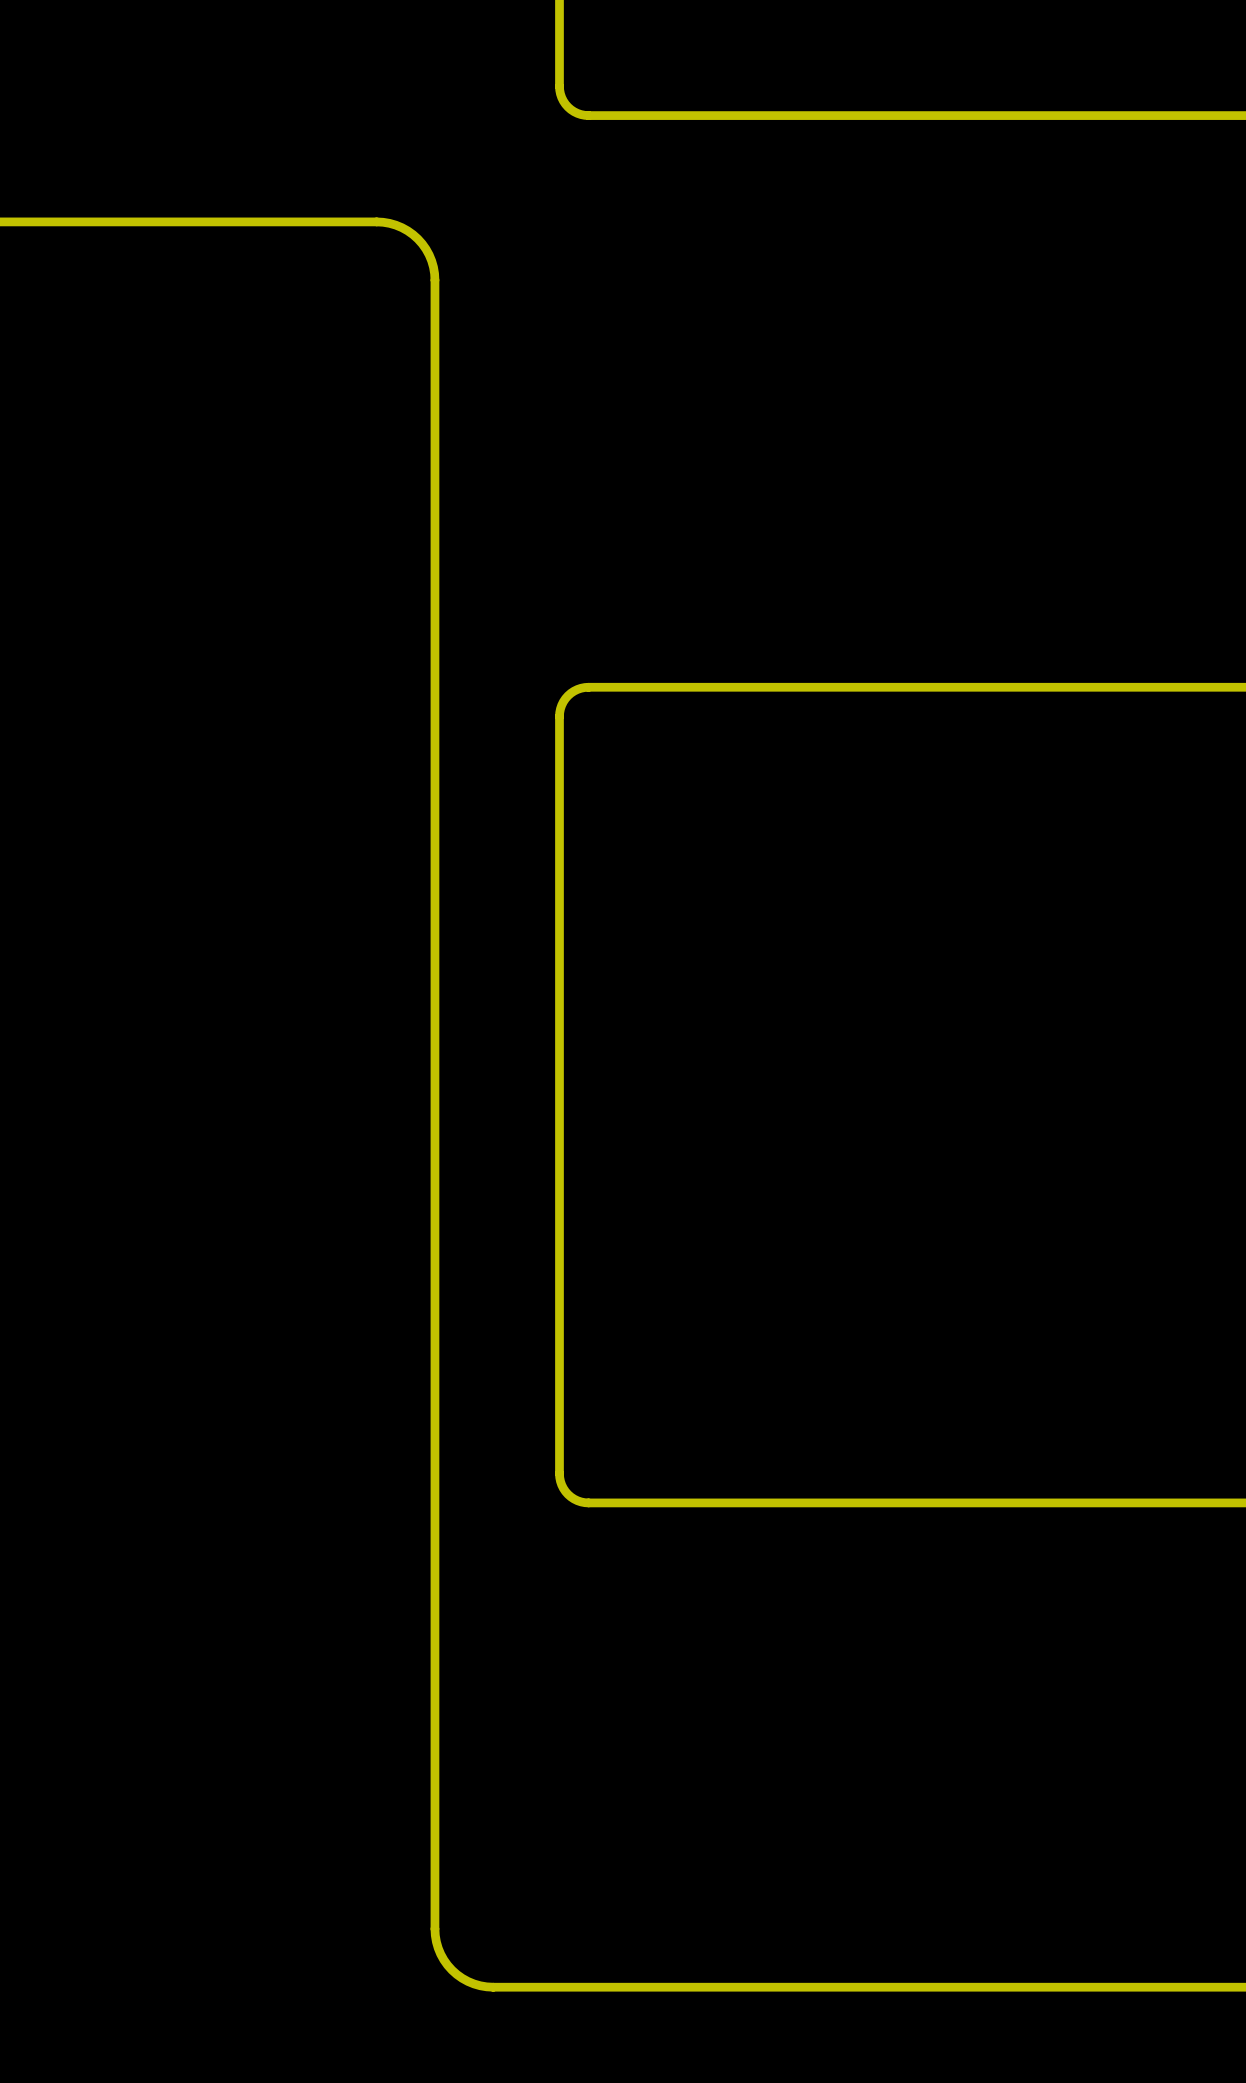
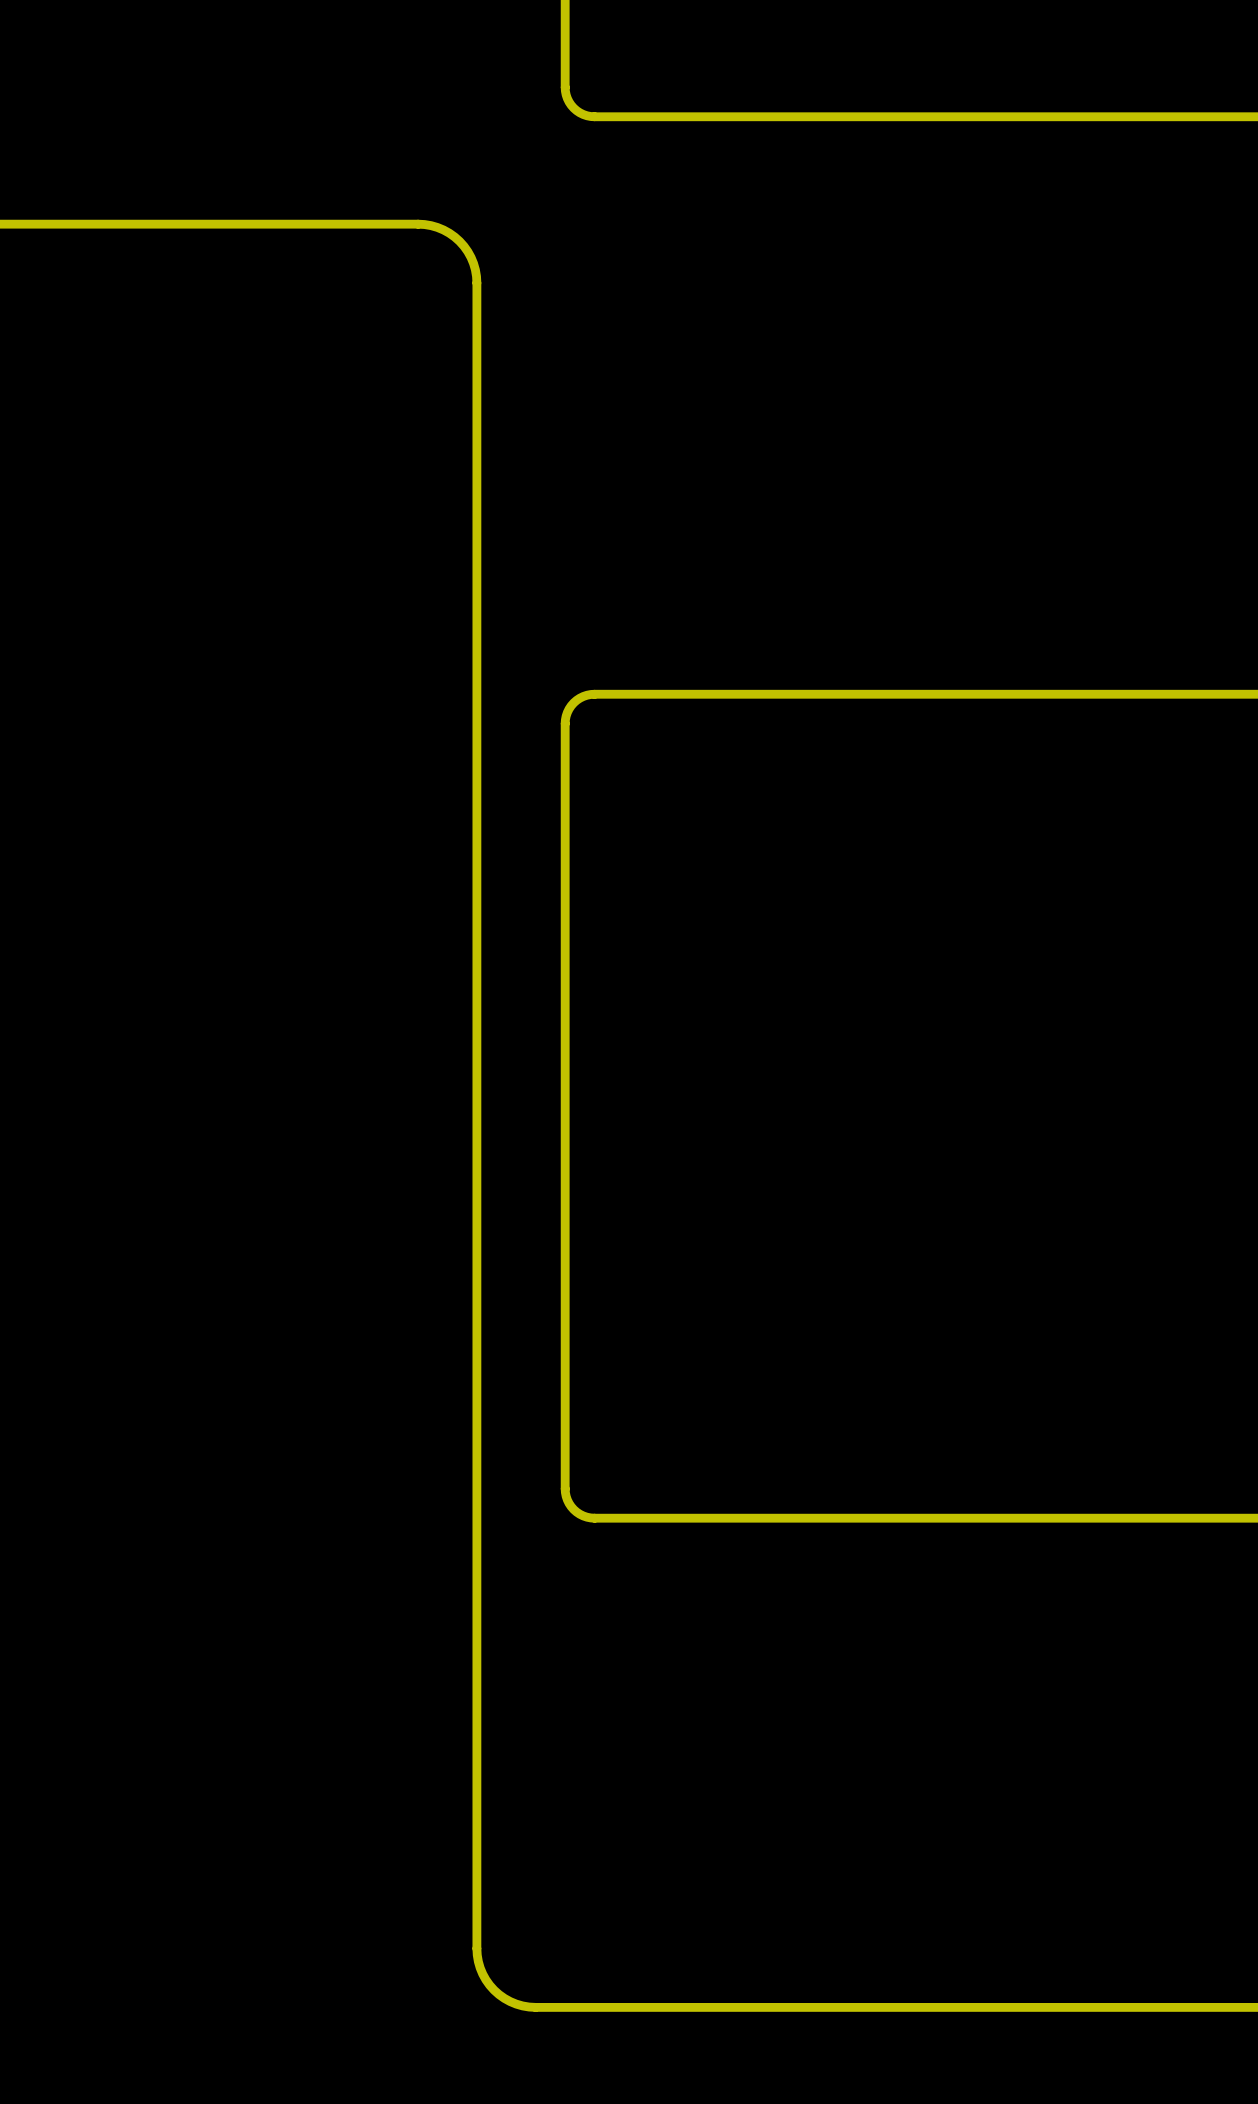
board edge: (376, 221) (401, 227) (417, 238) (429, 254) (434, 280) (435, 1935) (443, 1959) (452, 1970) (467, 1981) (486, 1986) (530, 1987) -> (380, 224) (424, 224) (443, 229) (464, 246) (471, 257) (476, 276) (476, 1948) (482, 1974) (494, 1990) (510, 2001) (535, 2007)

